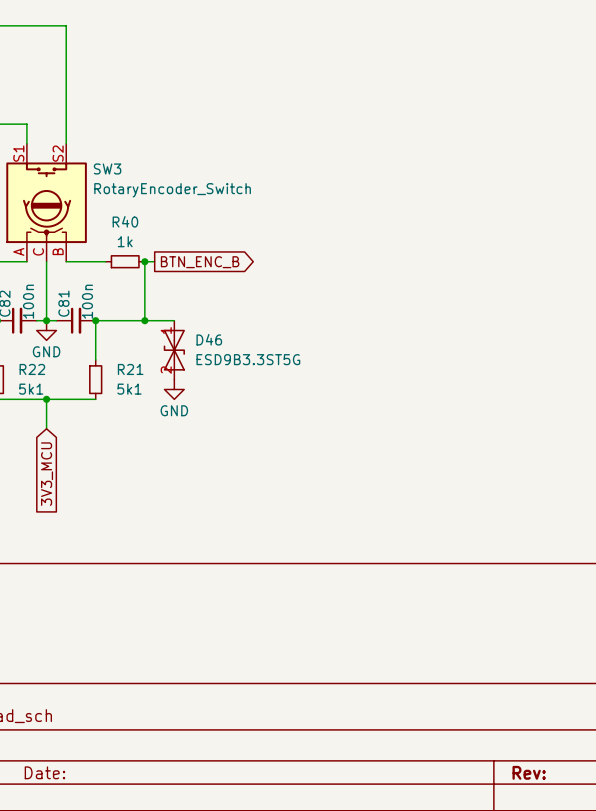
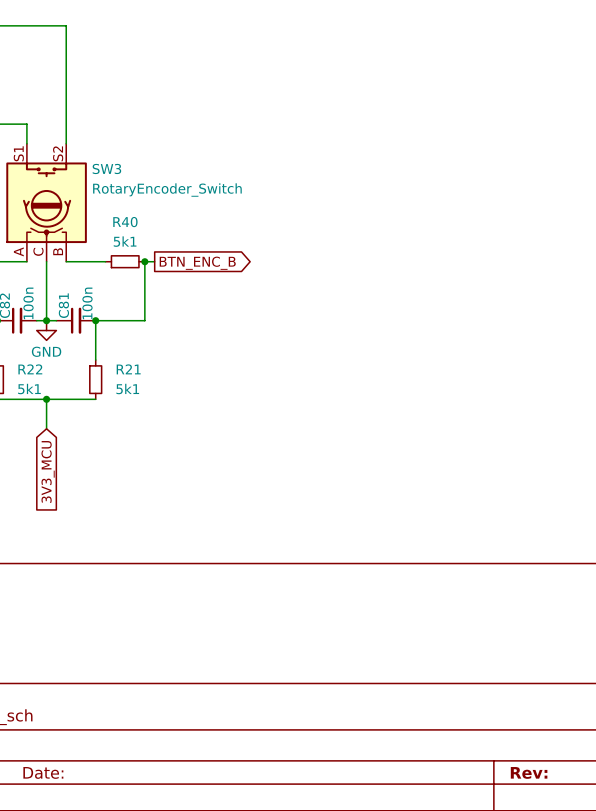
R40 value: 1k (125, 241) -> 5k1 (125, 241)
wire: (144, 320) (174, 320) -> none
junction: (144, 320) -> none
D46: ESD9B3.3ST5G (174, 350) -> none
power symbol: GND (174, 389) -> none

